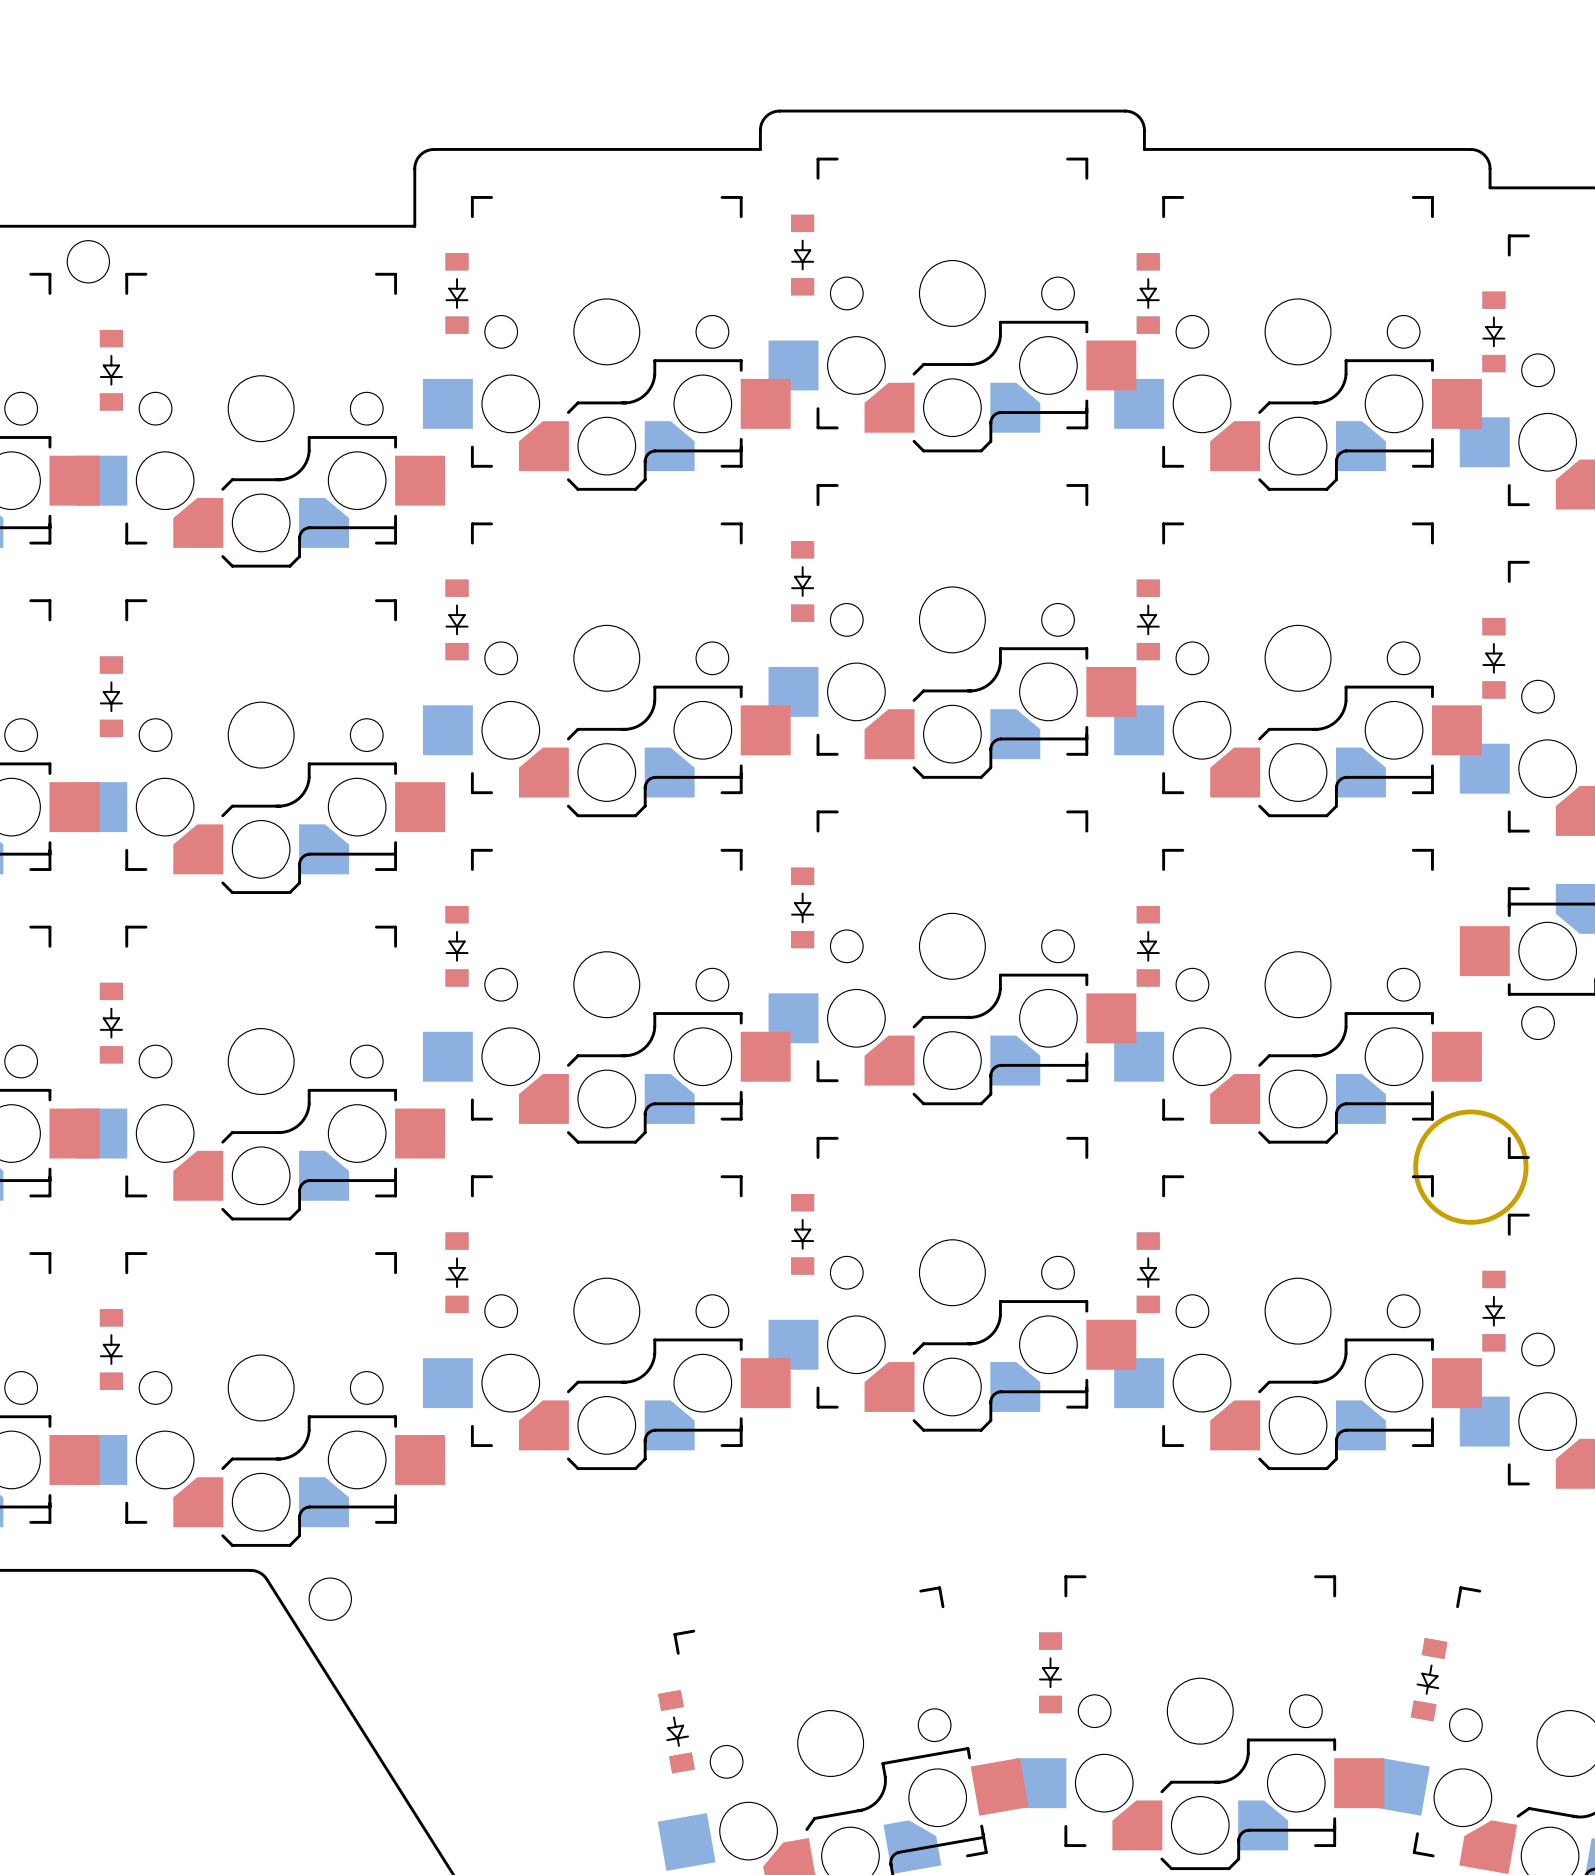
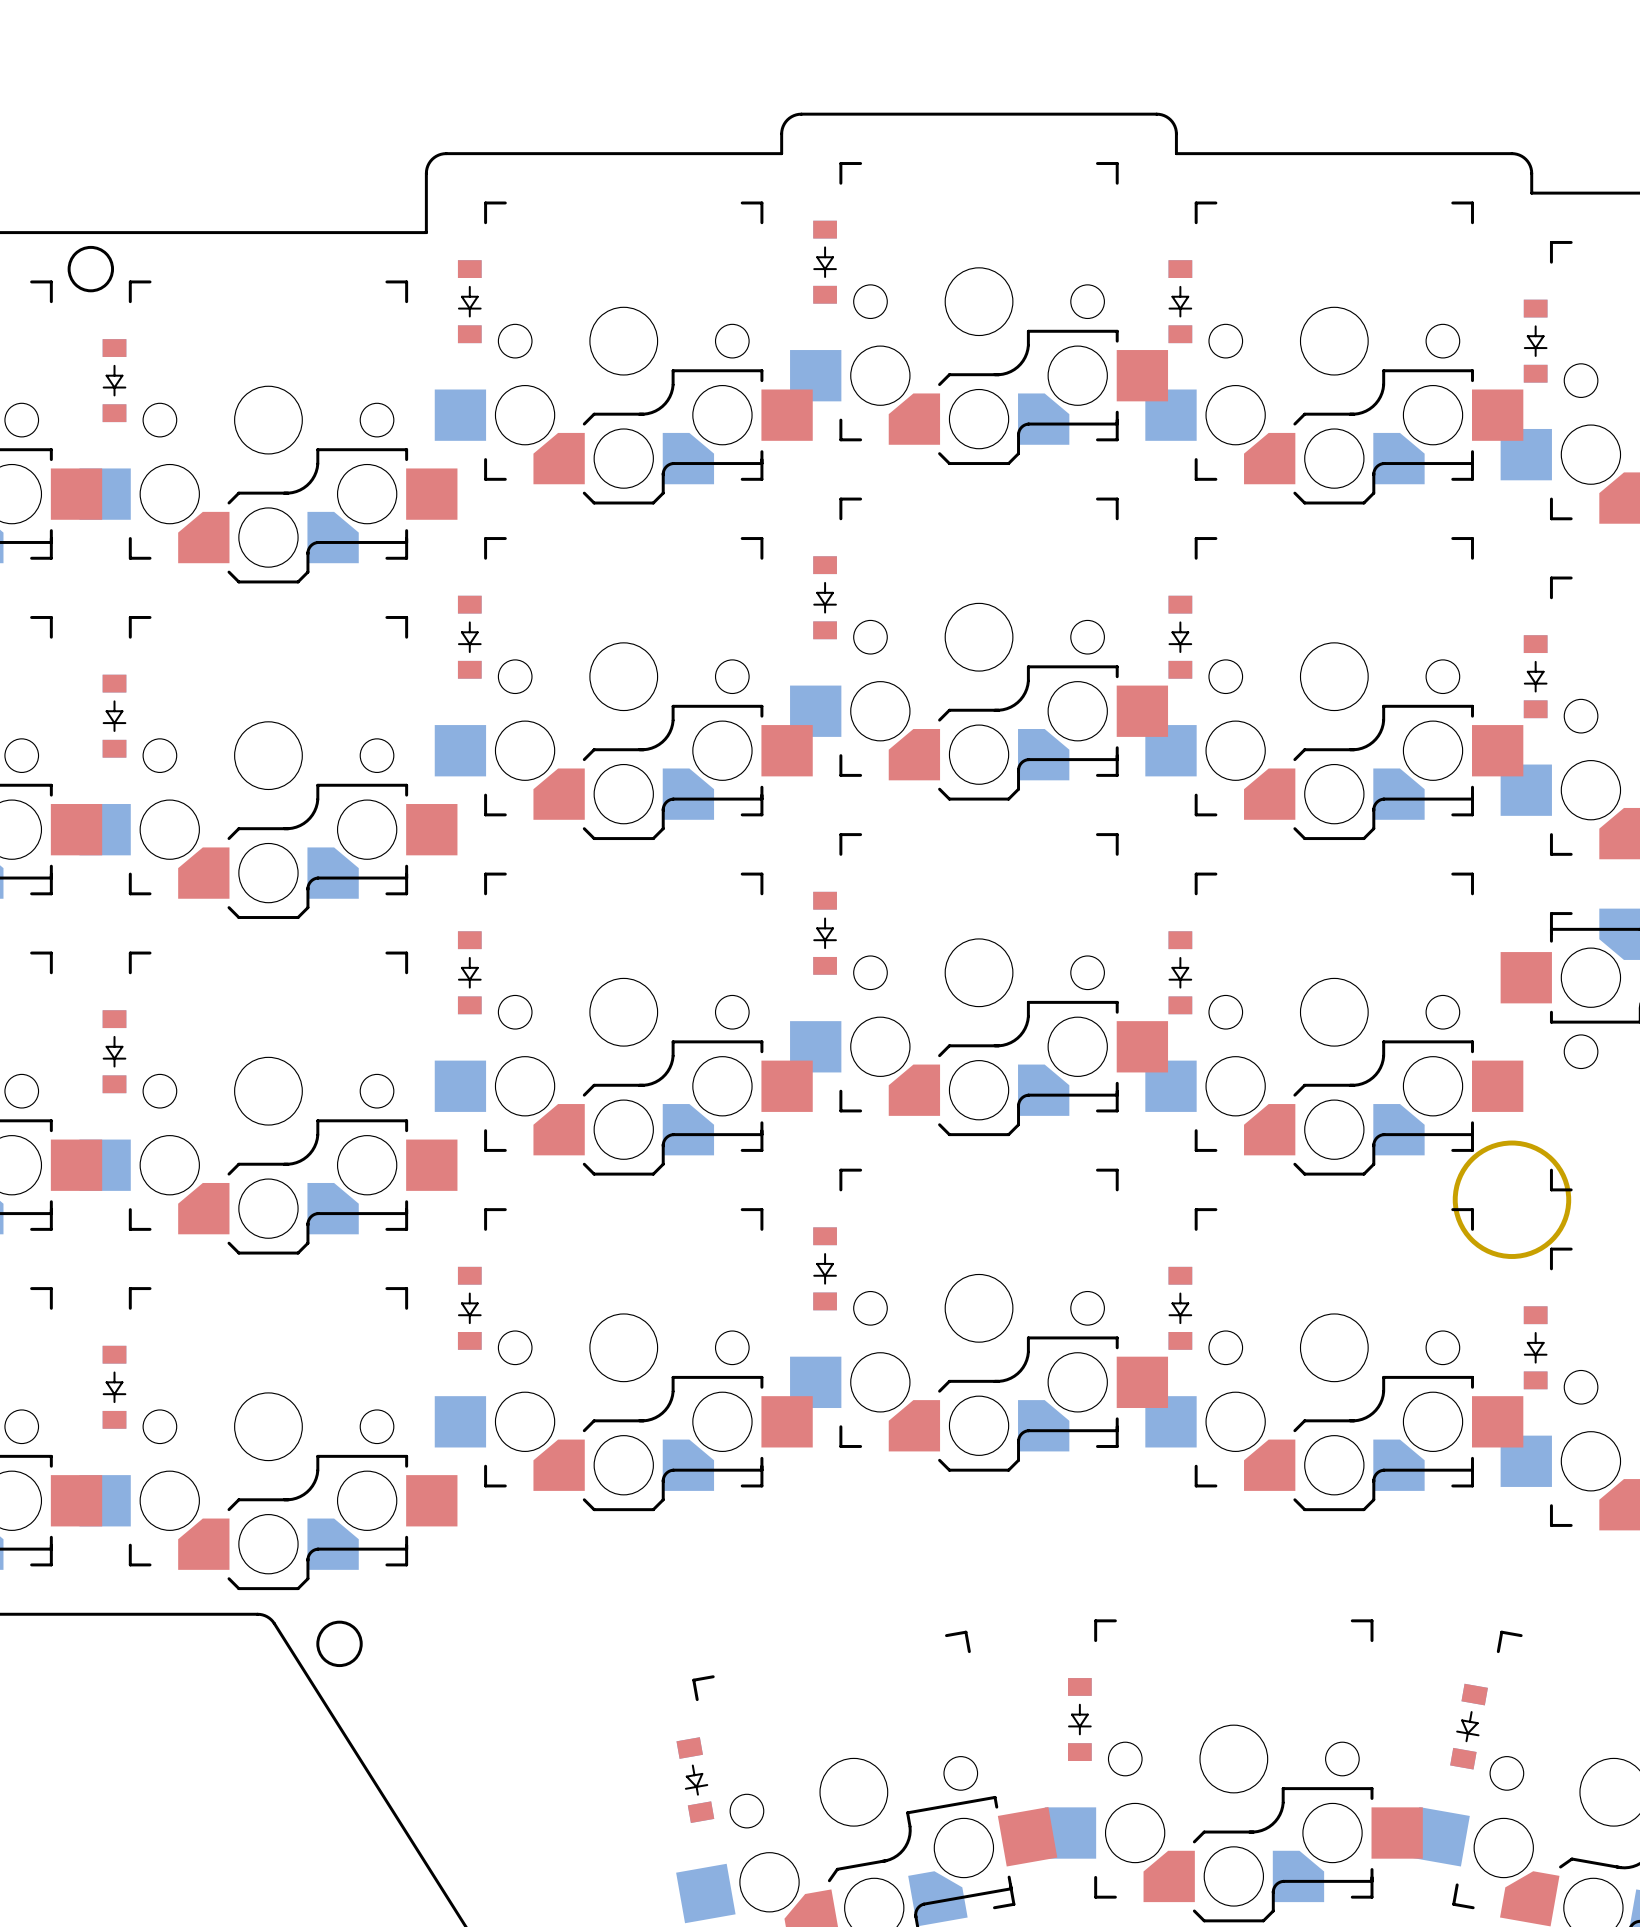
round board edge: none -> [67, 245, 115, 293]
round board edge: none -> [316, 1620, 363, 1668]

